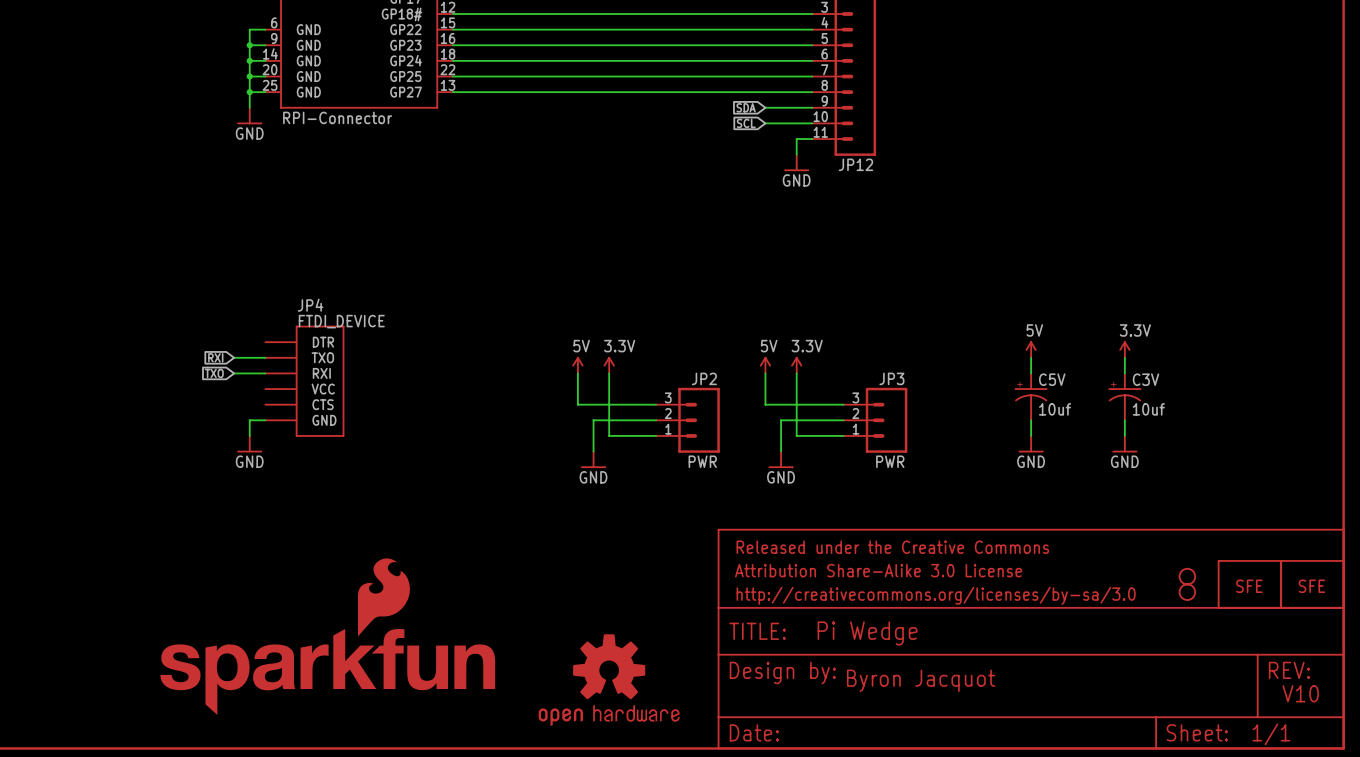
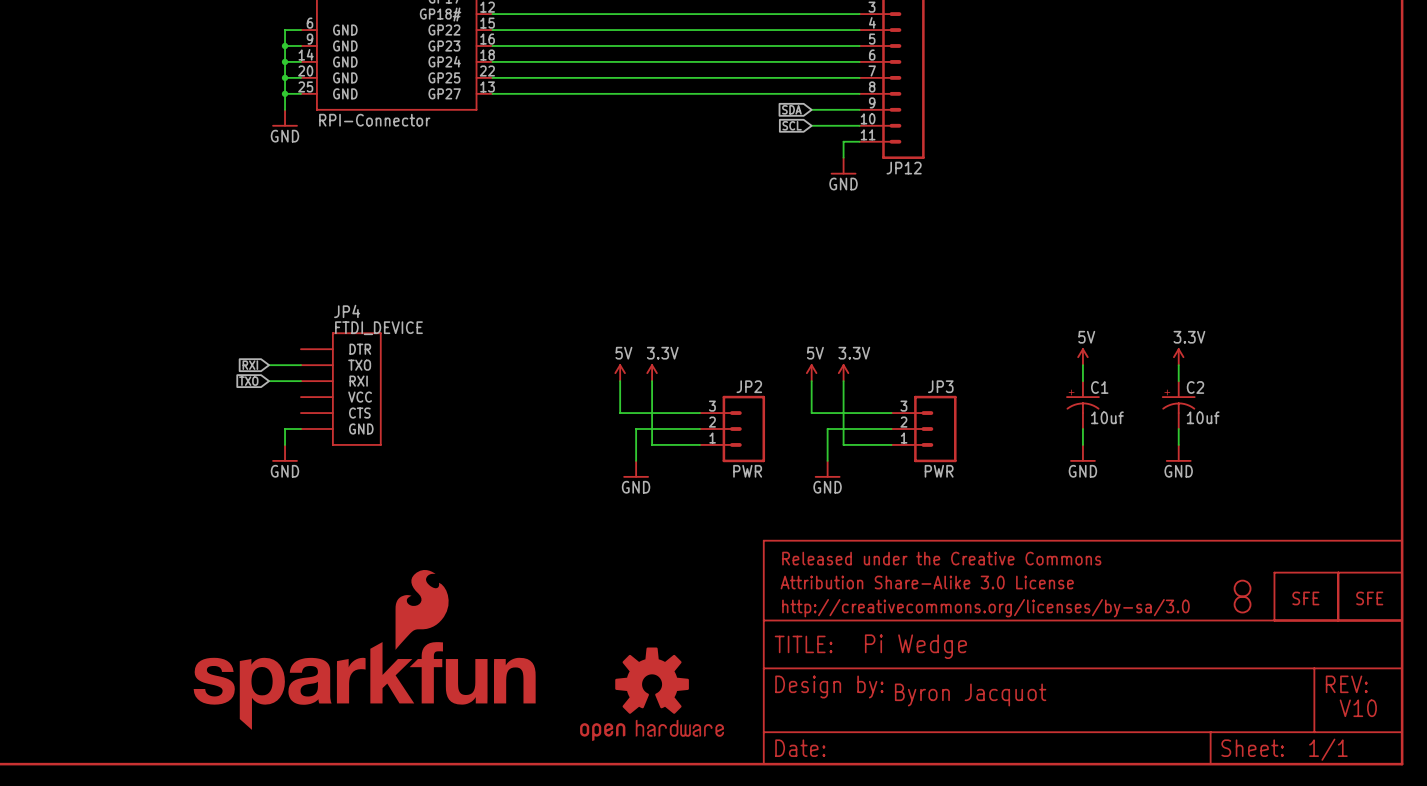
C5V name: C5V (1052, 379) -> C1 (1099, 387)
C3V name: C3V (1145, 379) -> C2 (1195, 387)

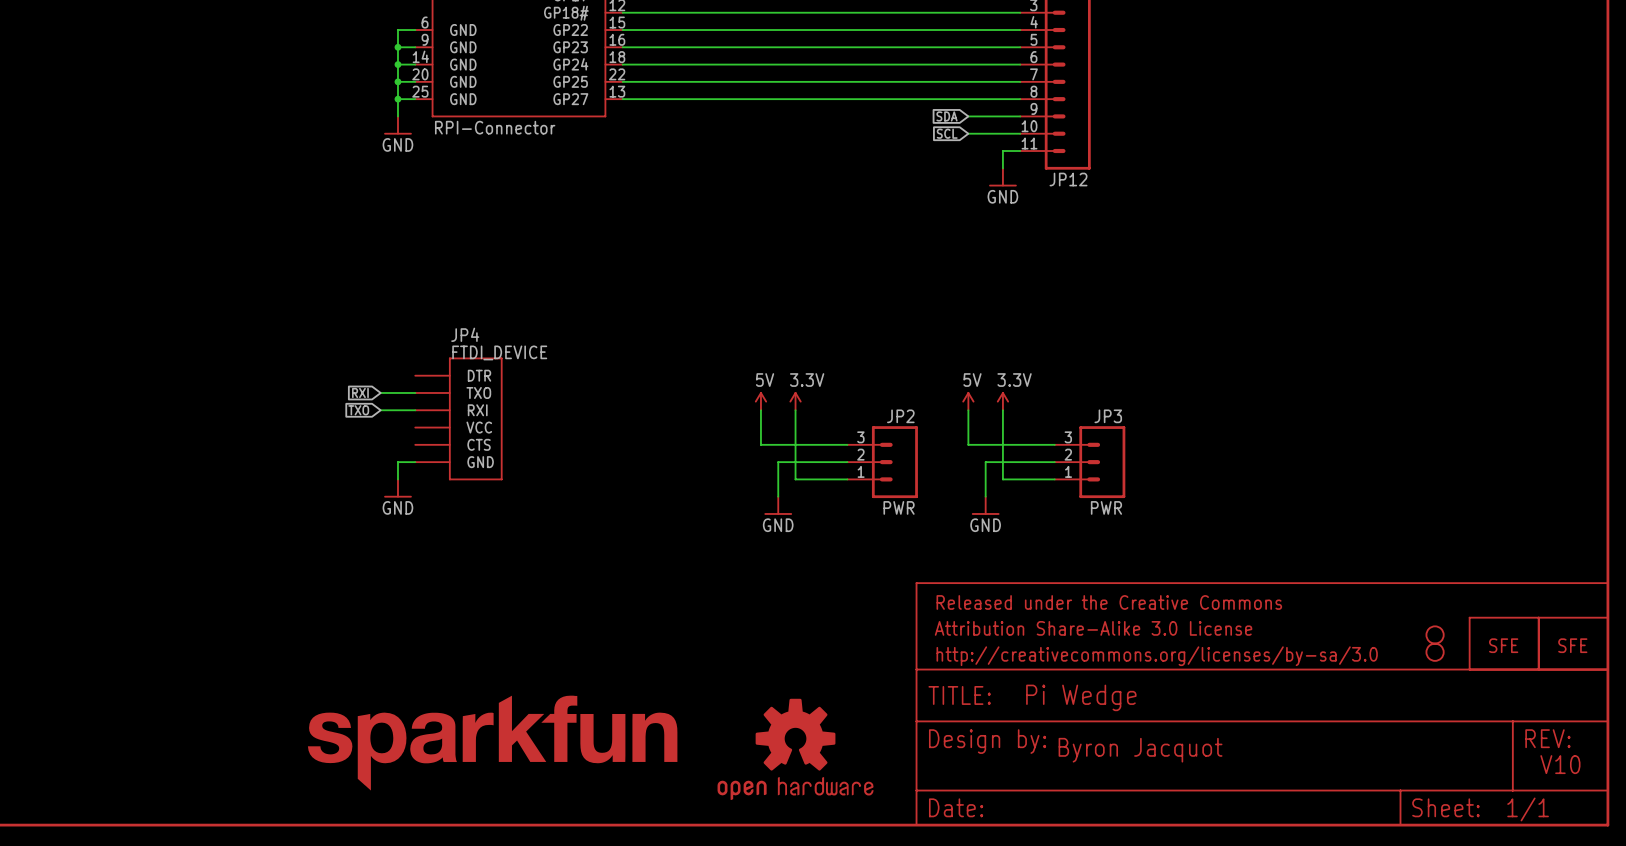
power symbol: 5V (1082, 356) -> none
power symbol: 3.3V (1178, 356) -> none
wire: (1082, 365) (1082, 381) -> none
wire: (1178, 365) (1178, 381) -> none
C1: 10uf (1082, 405) -> none
C2: 10uf (1178, 405) -> none
wire: (1082, 429) (1082, 444) -> none
wire: (1178, 429) (1178, 444) -> none
power symbol: GND (1082, 453) -> none
power symbol: GND (1178, 453) -> none
part: (364, 649) -> none
part: none -> (492, 743)

